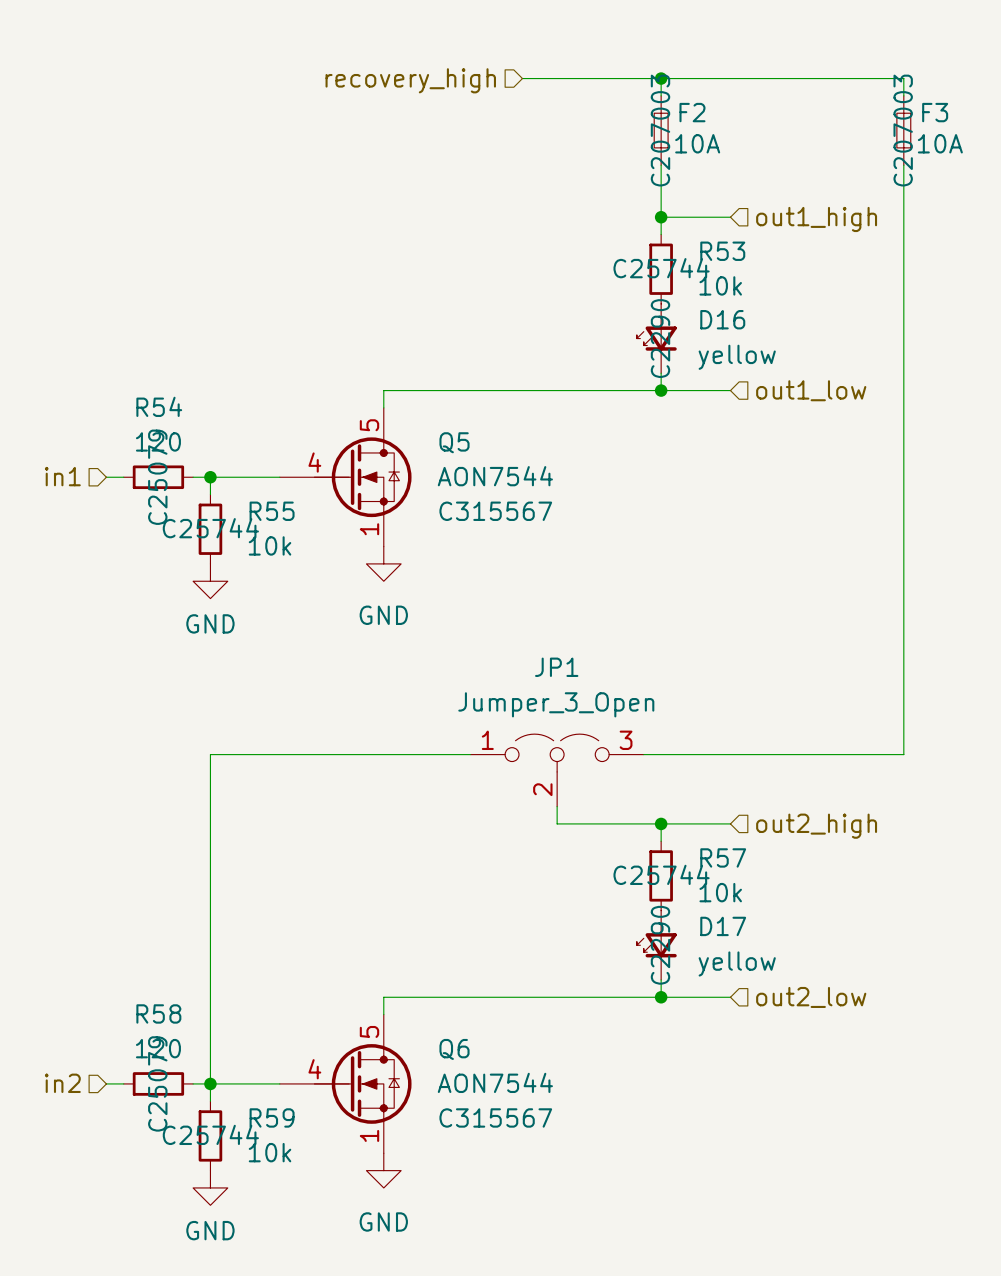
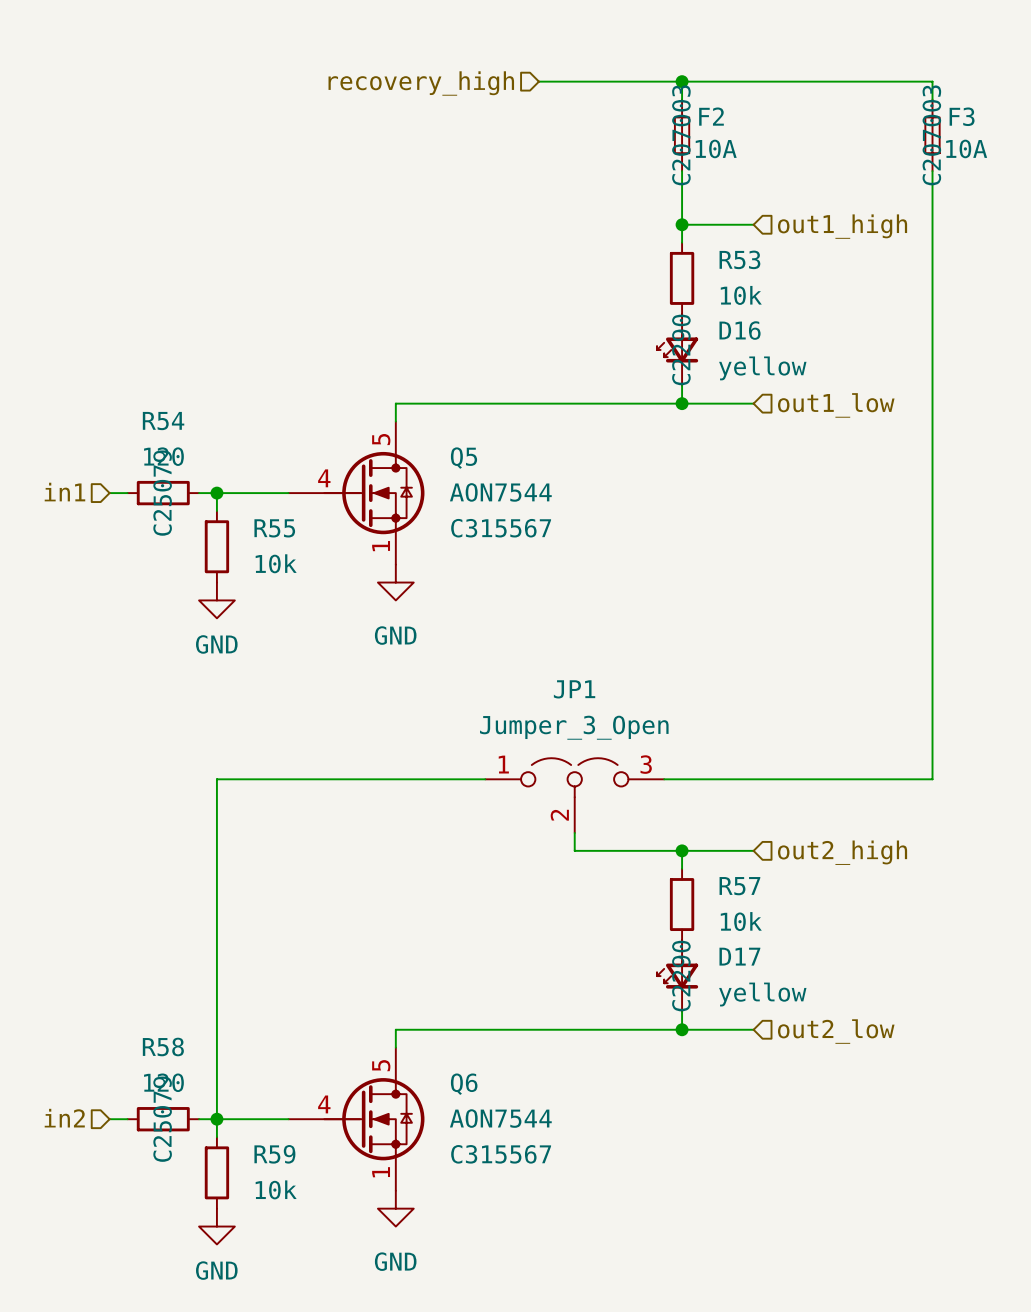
R53 text: C25744 (661, 268) -> none
R55 text: C25744 (210, 528) -> none
R57 text: C25744 (661, 874) -> none
R59 text: C25744 (210, 1134) -> none

